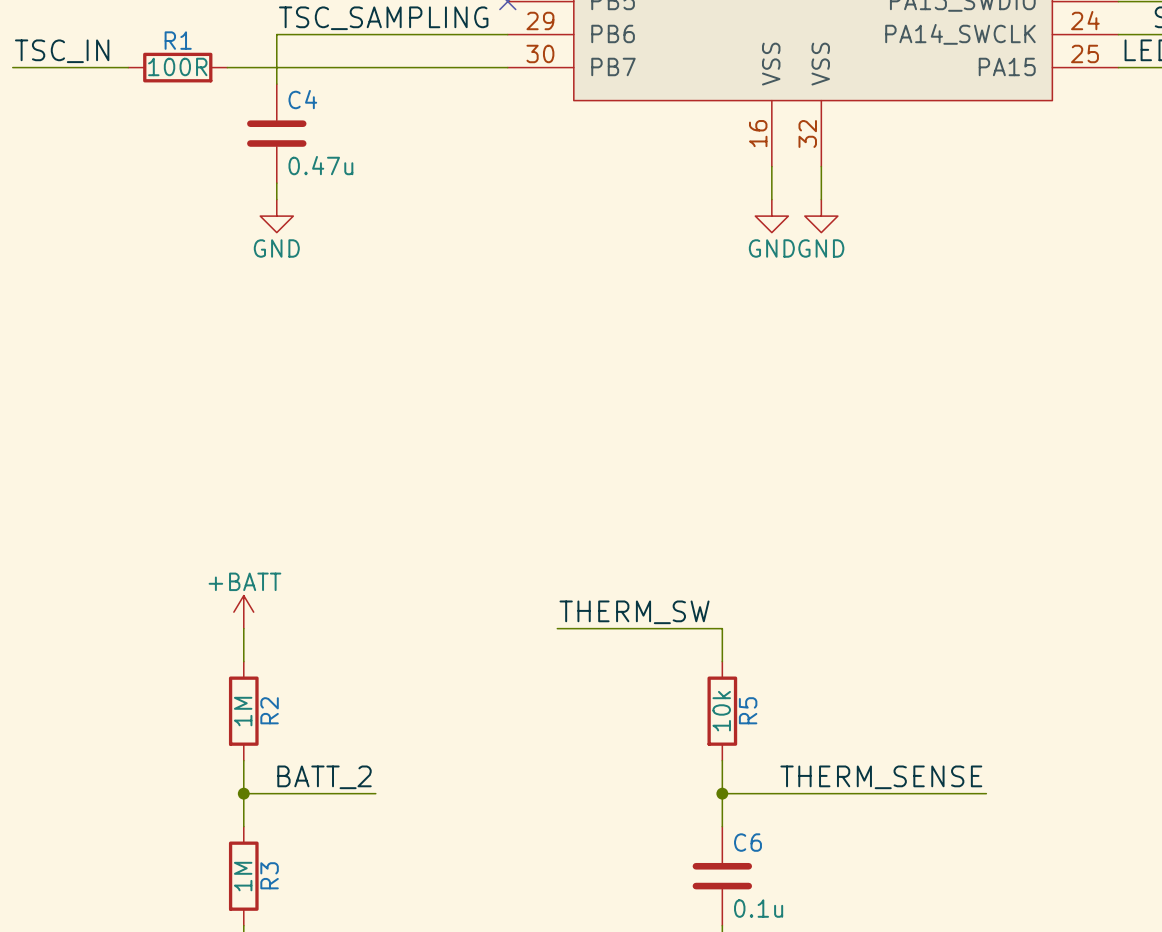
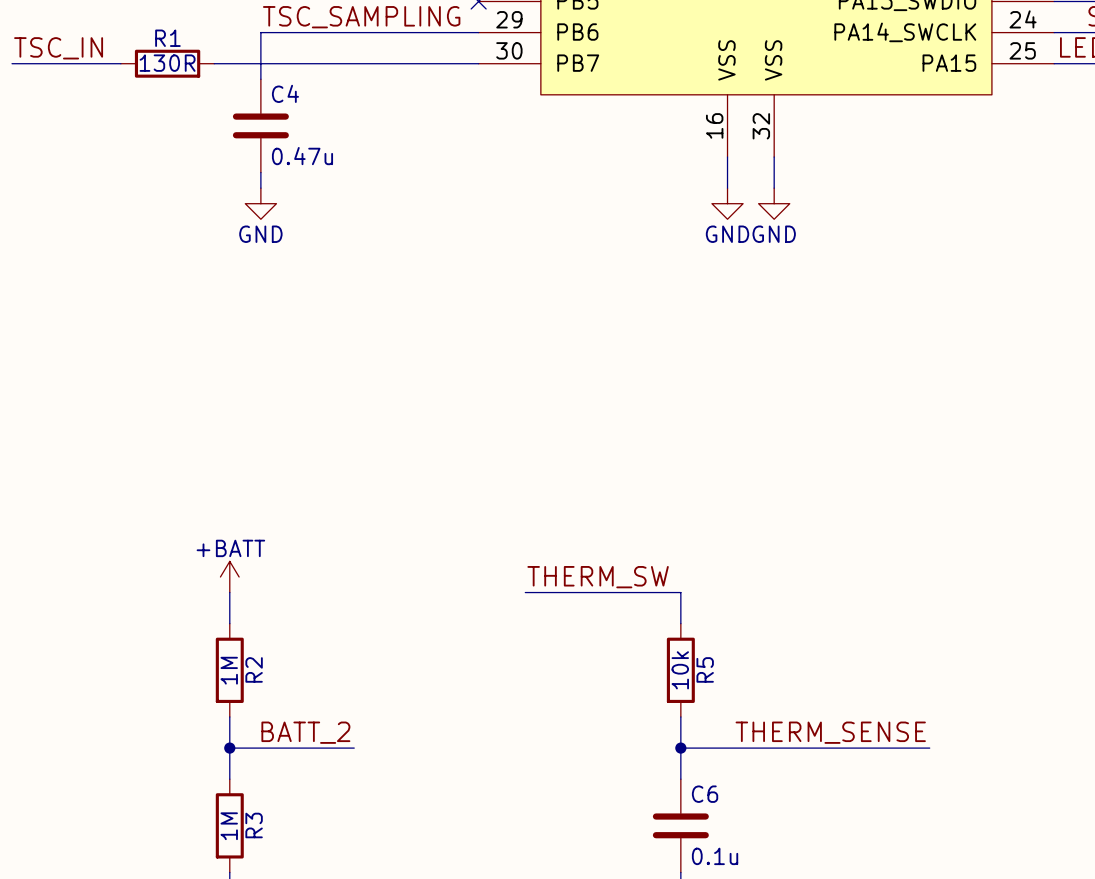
R1 value: 100R (177, 66) -> 130R (167, 63)

